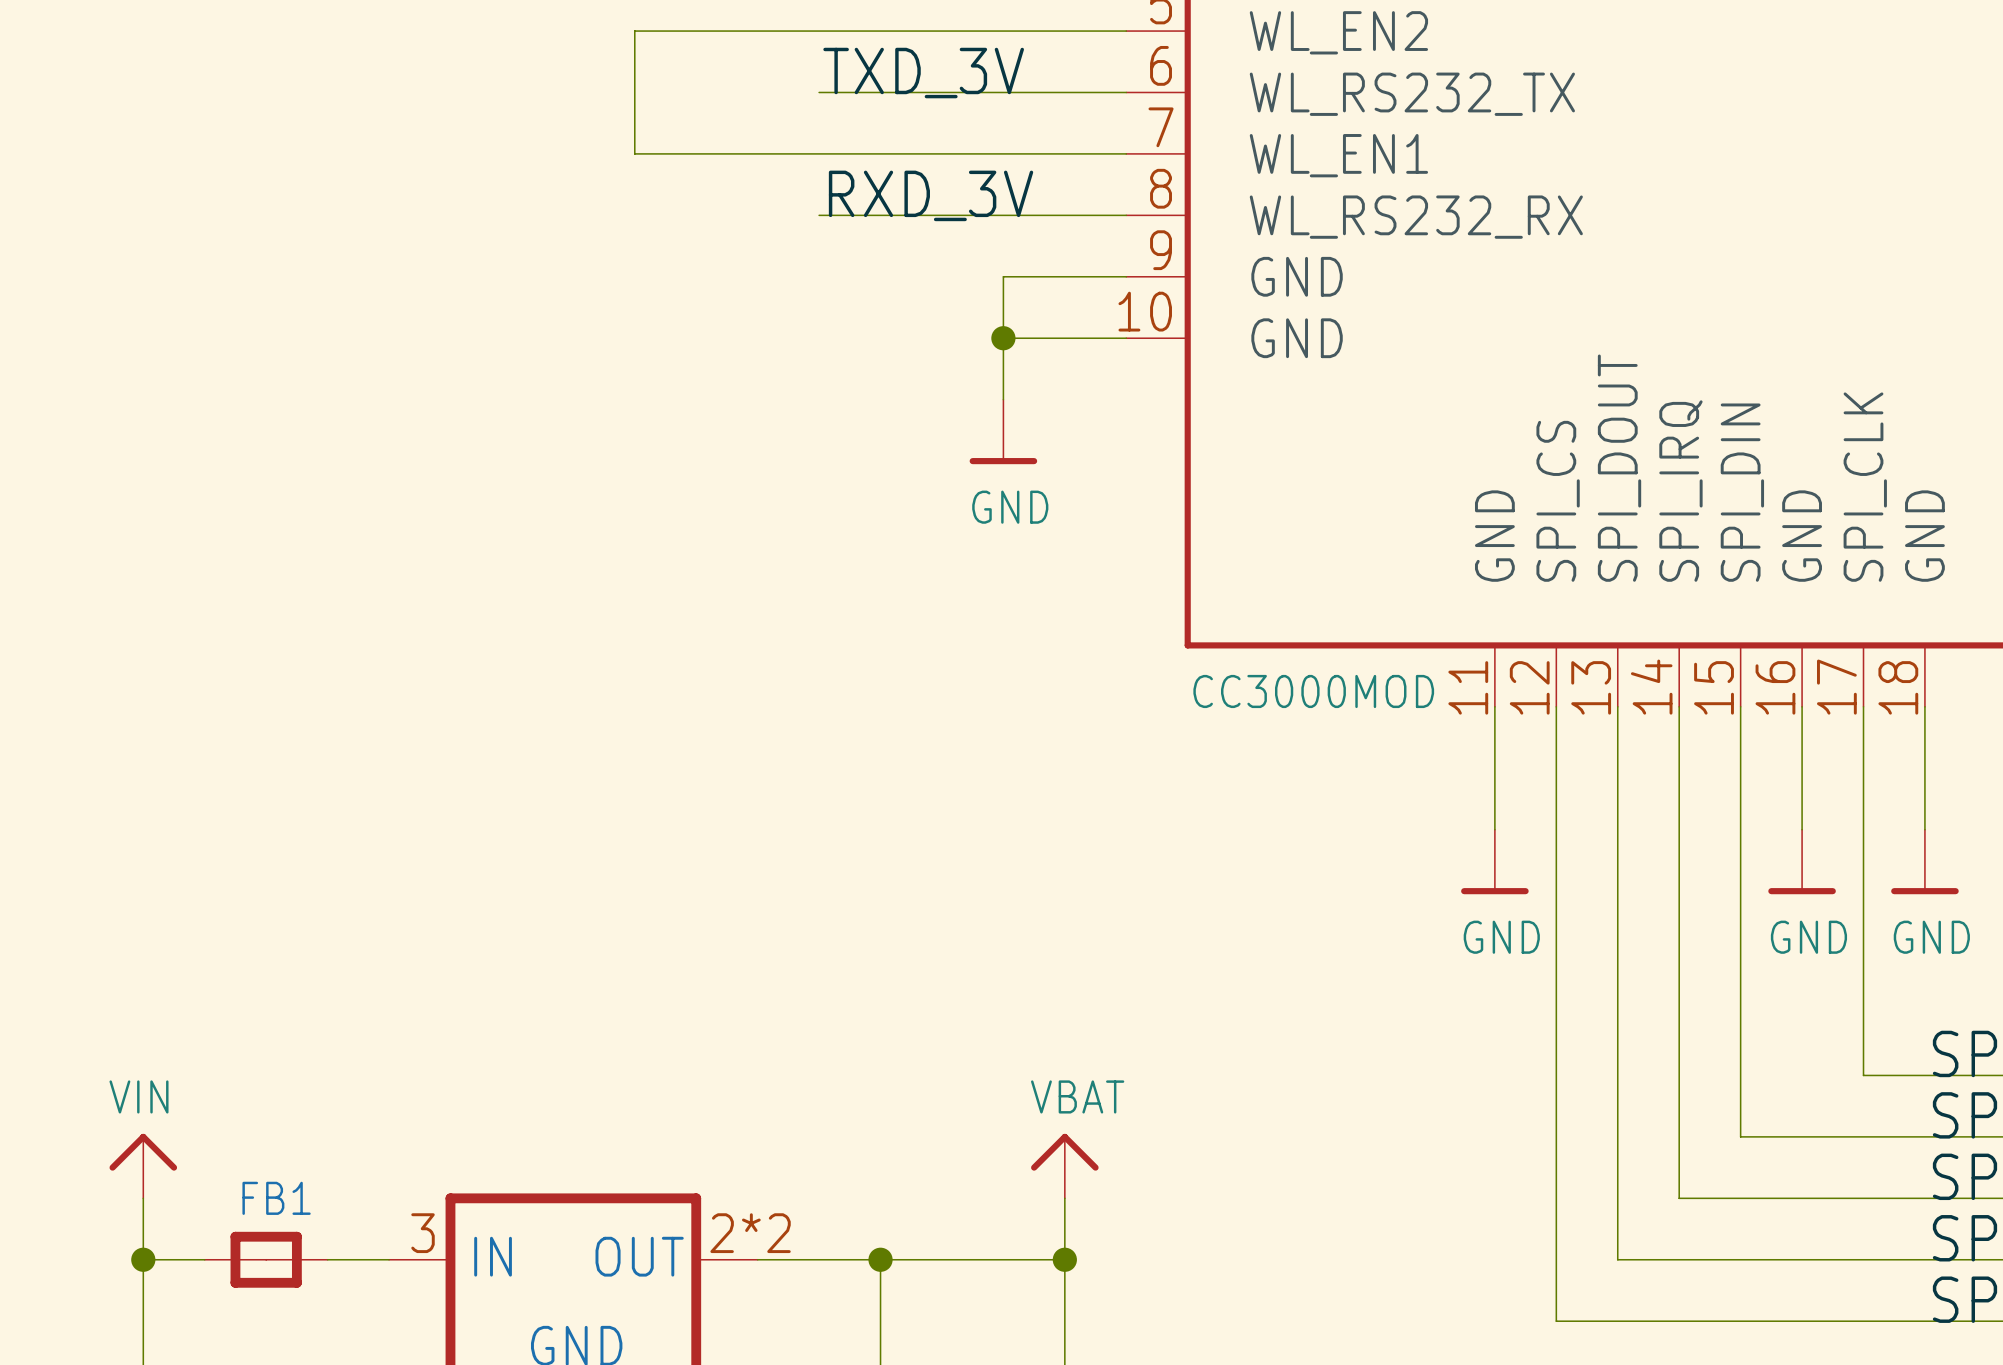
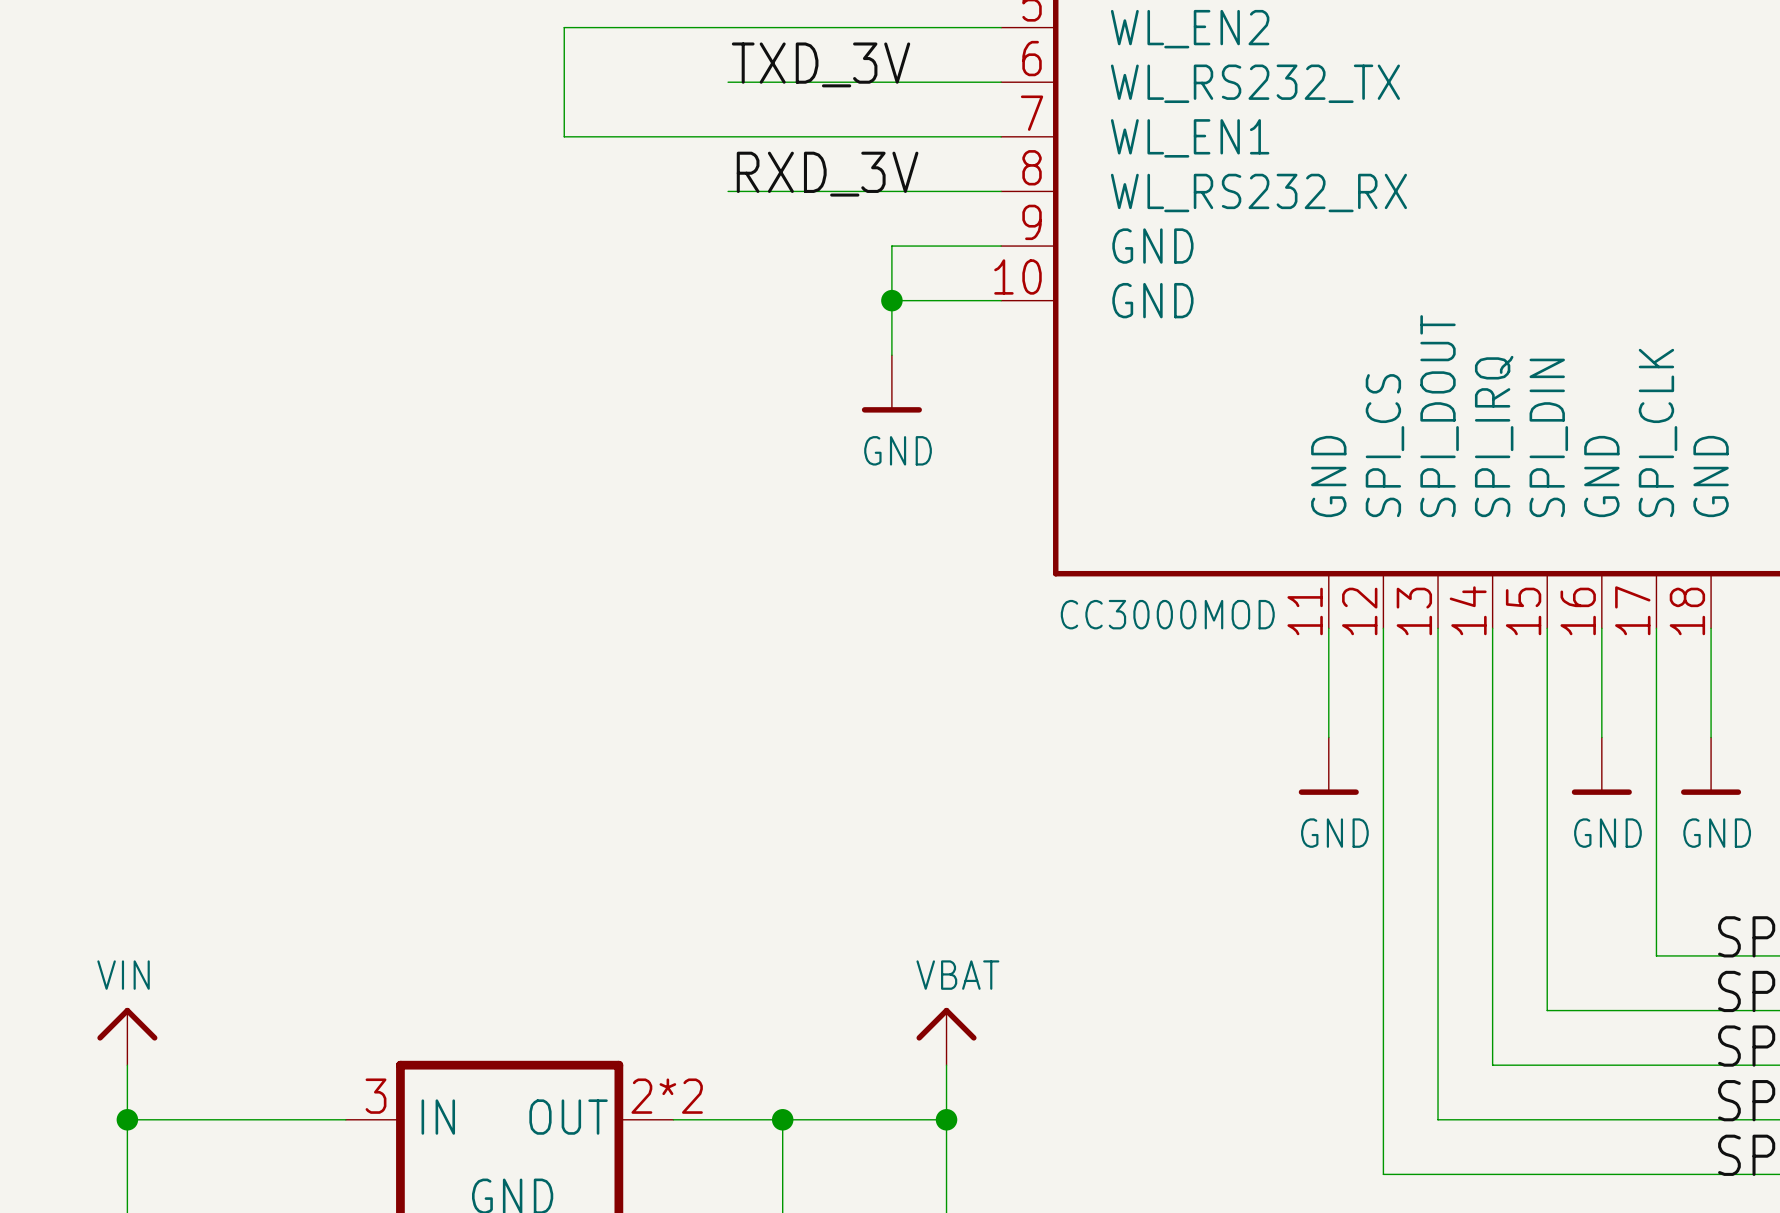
FB1: (266, 1259) -> none

